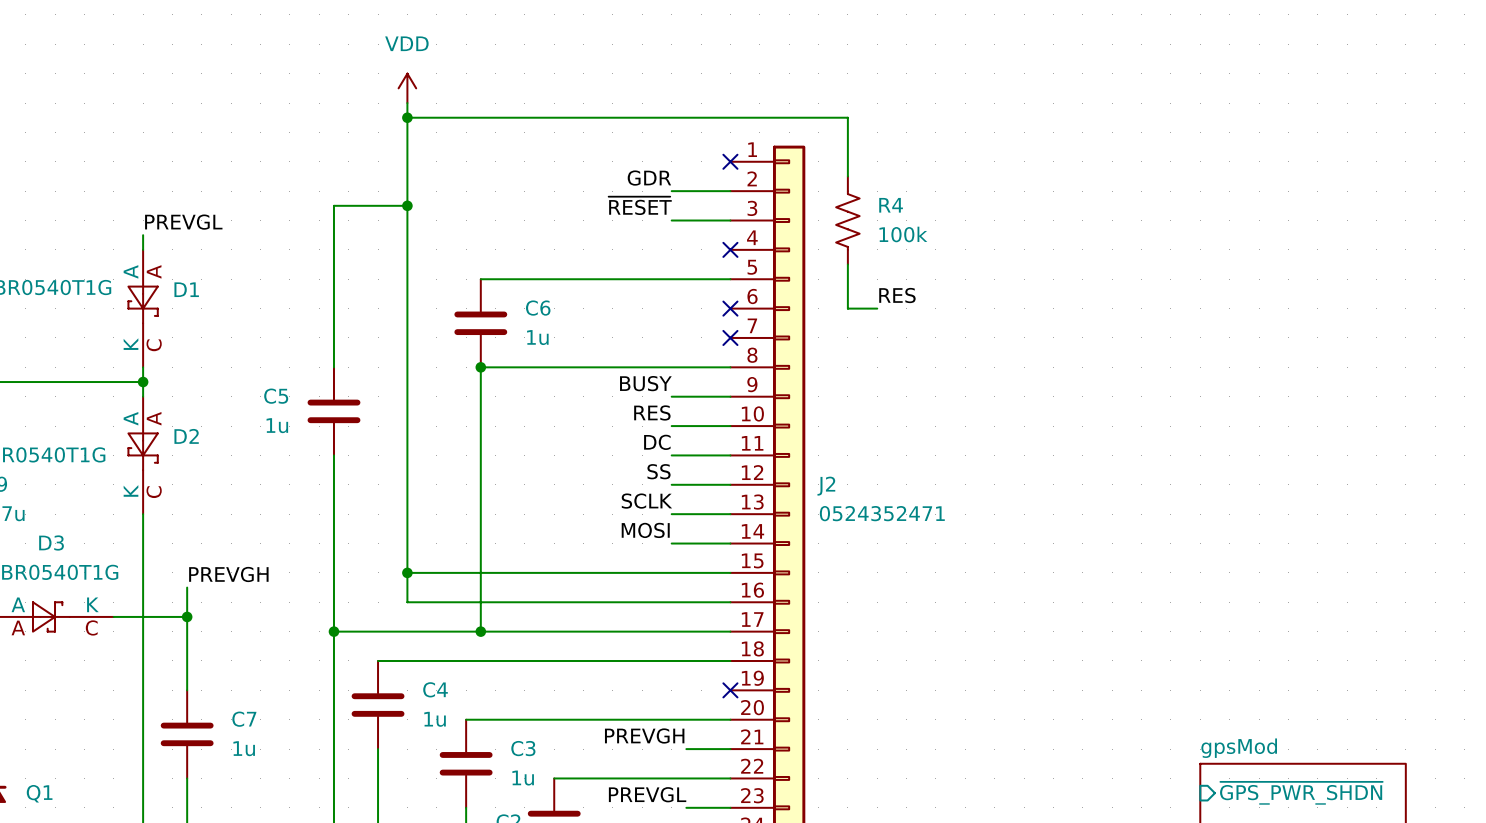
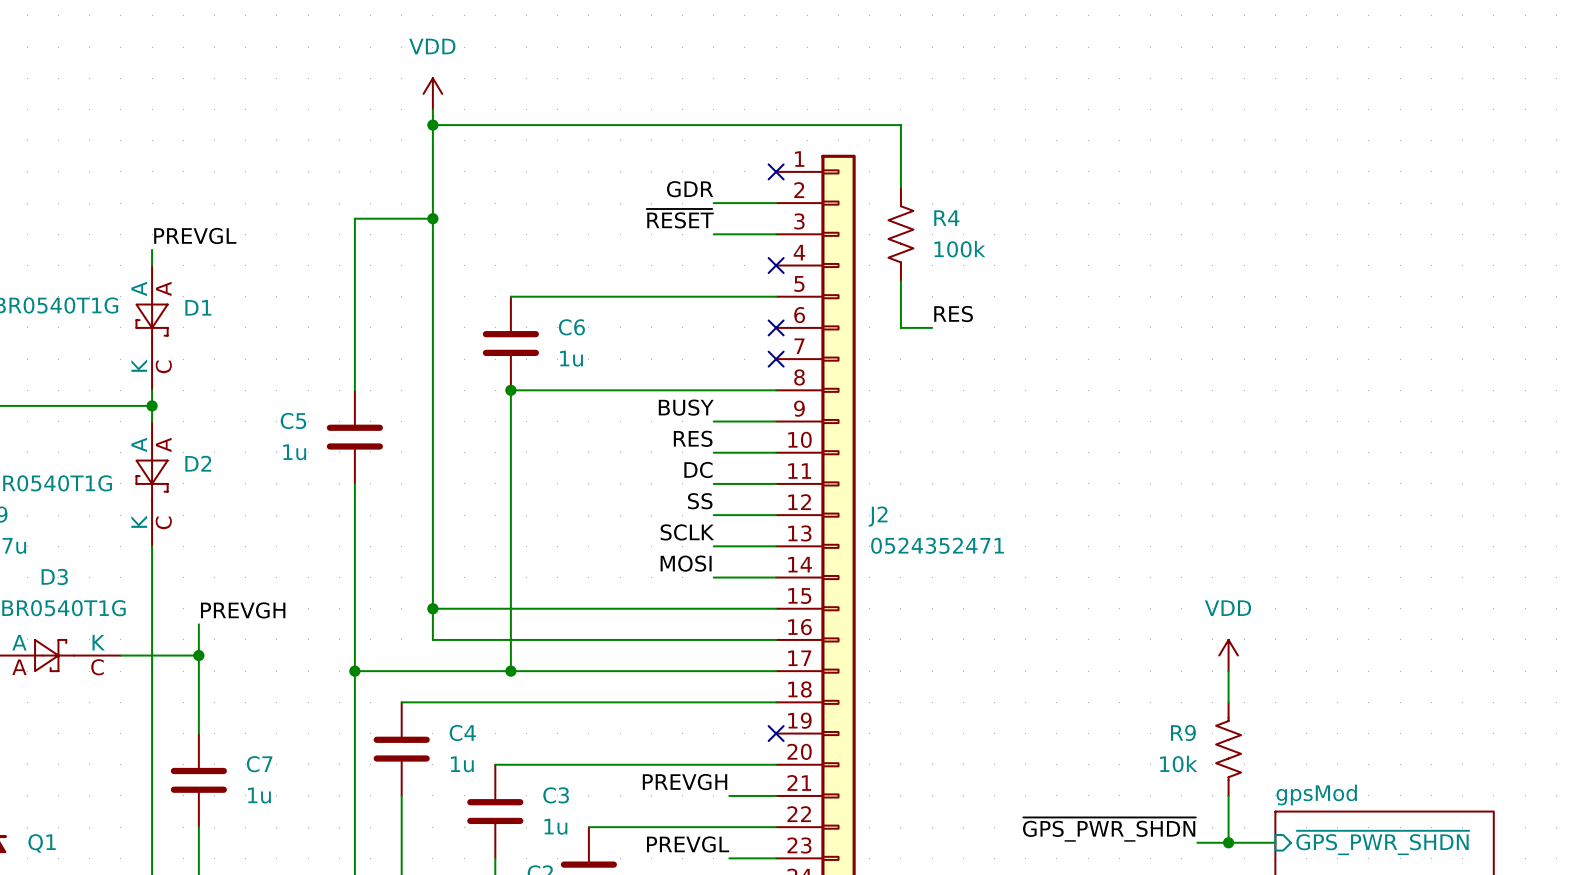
power symbol: none -> VDD (1228, 655)
wire: none -> (1228, 671) (1228, 702)
R9: none -> 10k (1228, 749)
wire: none -> (1228, 795) (1228, 842)
label: none -> ~{GPS_PWR_SHDN} (1109, 829)
wire: none -> (1197, 842) (1275, 842)
junction: none -> (1228, 842)

